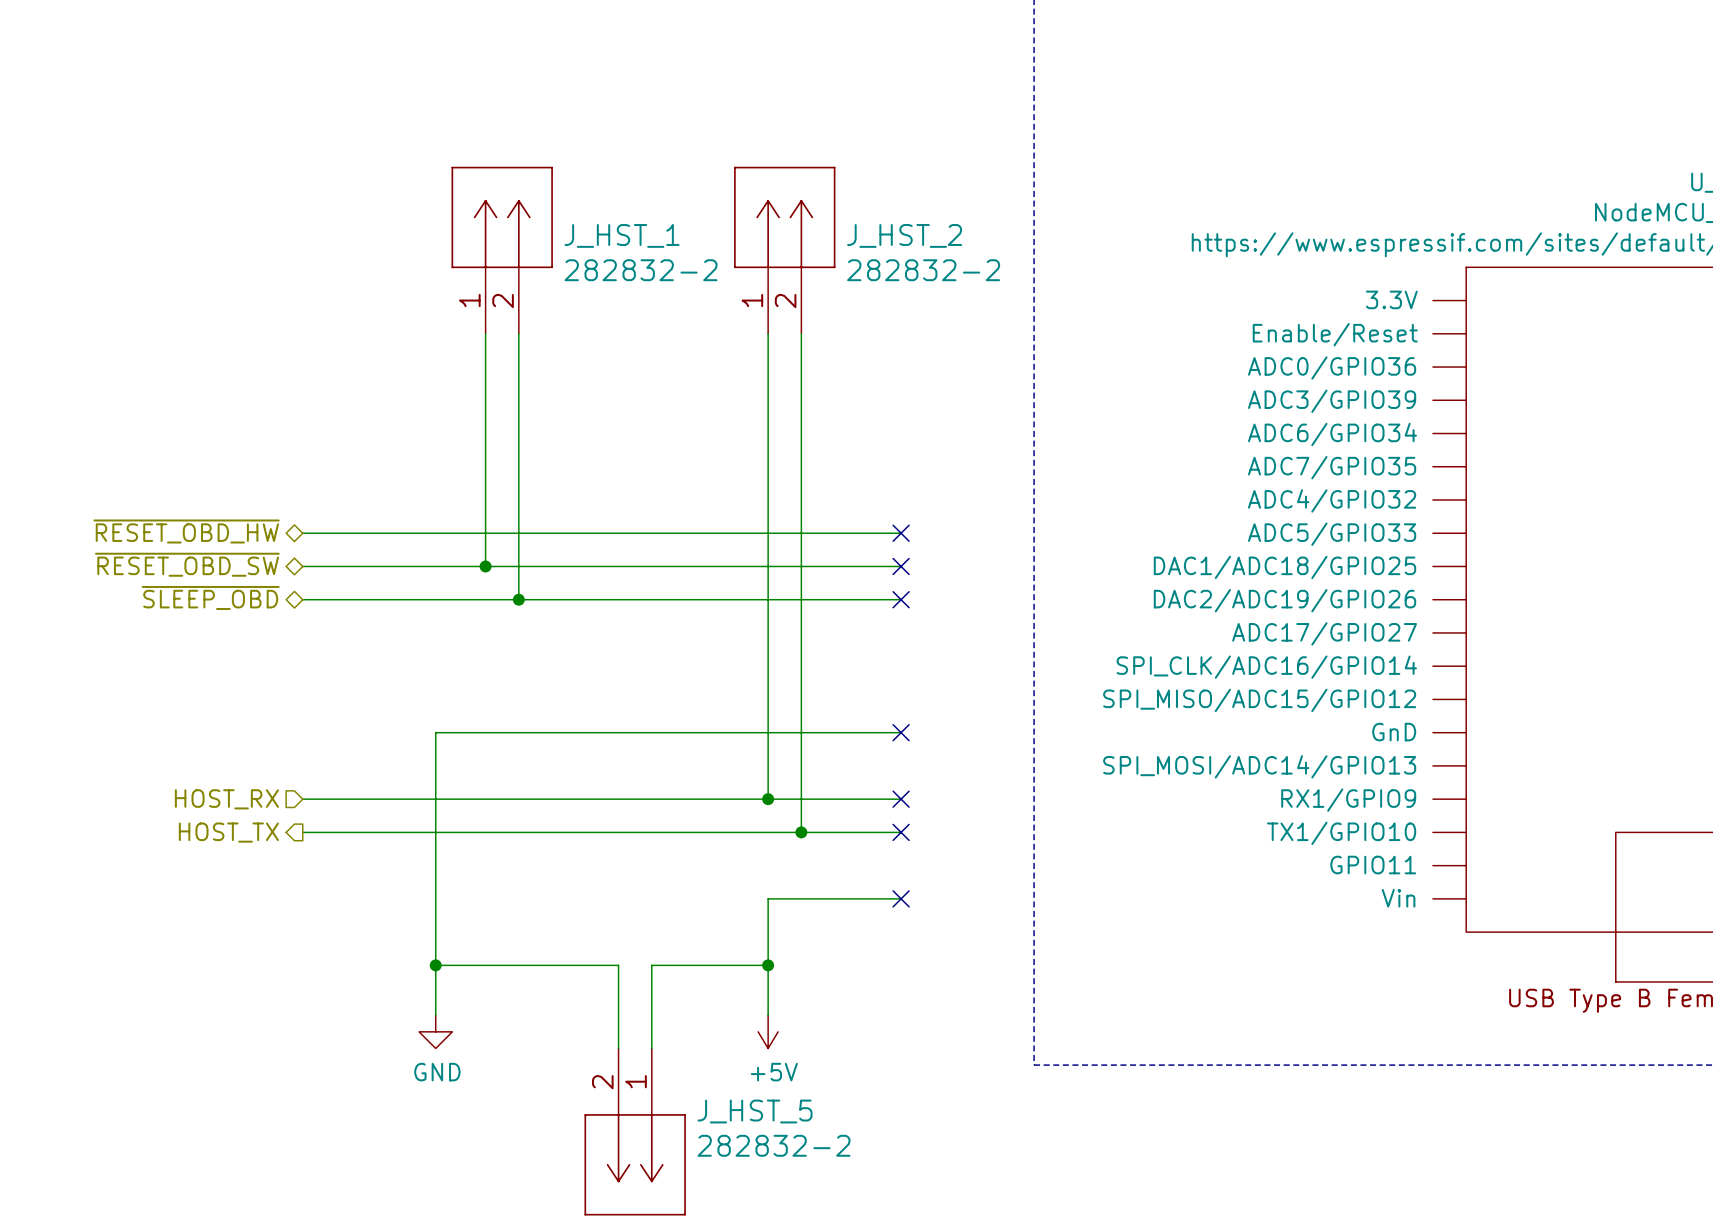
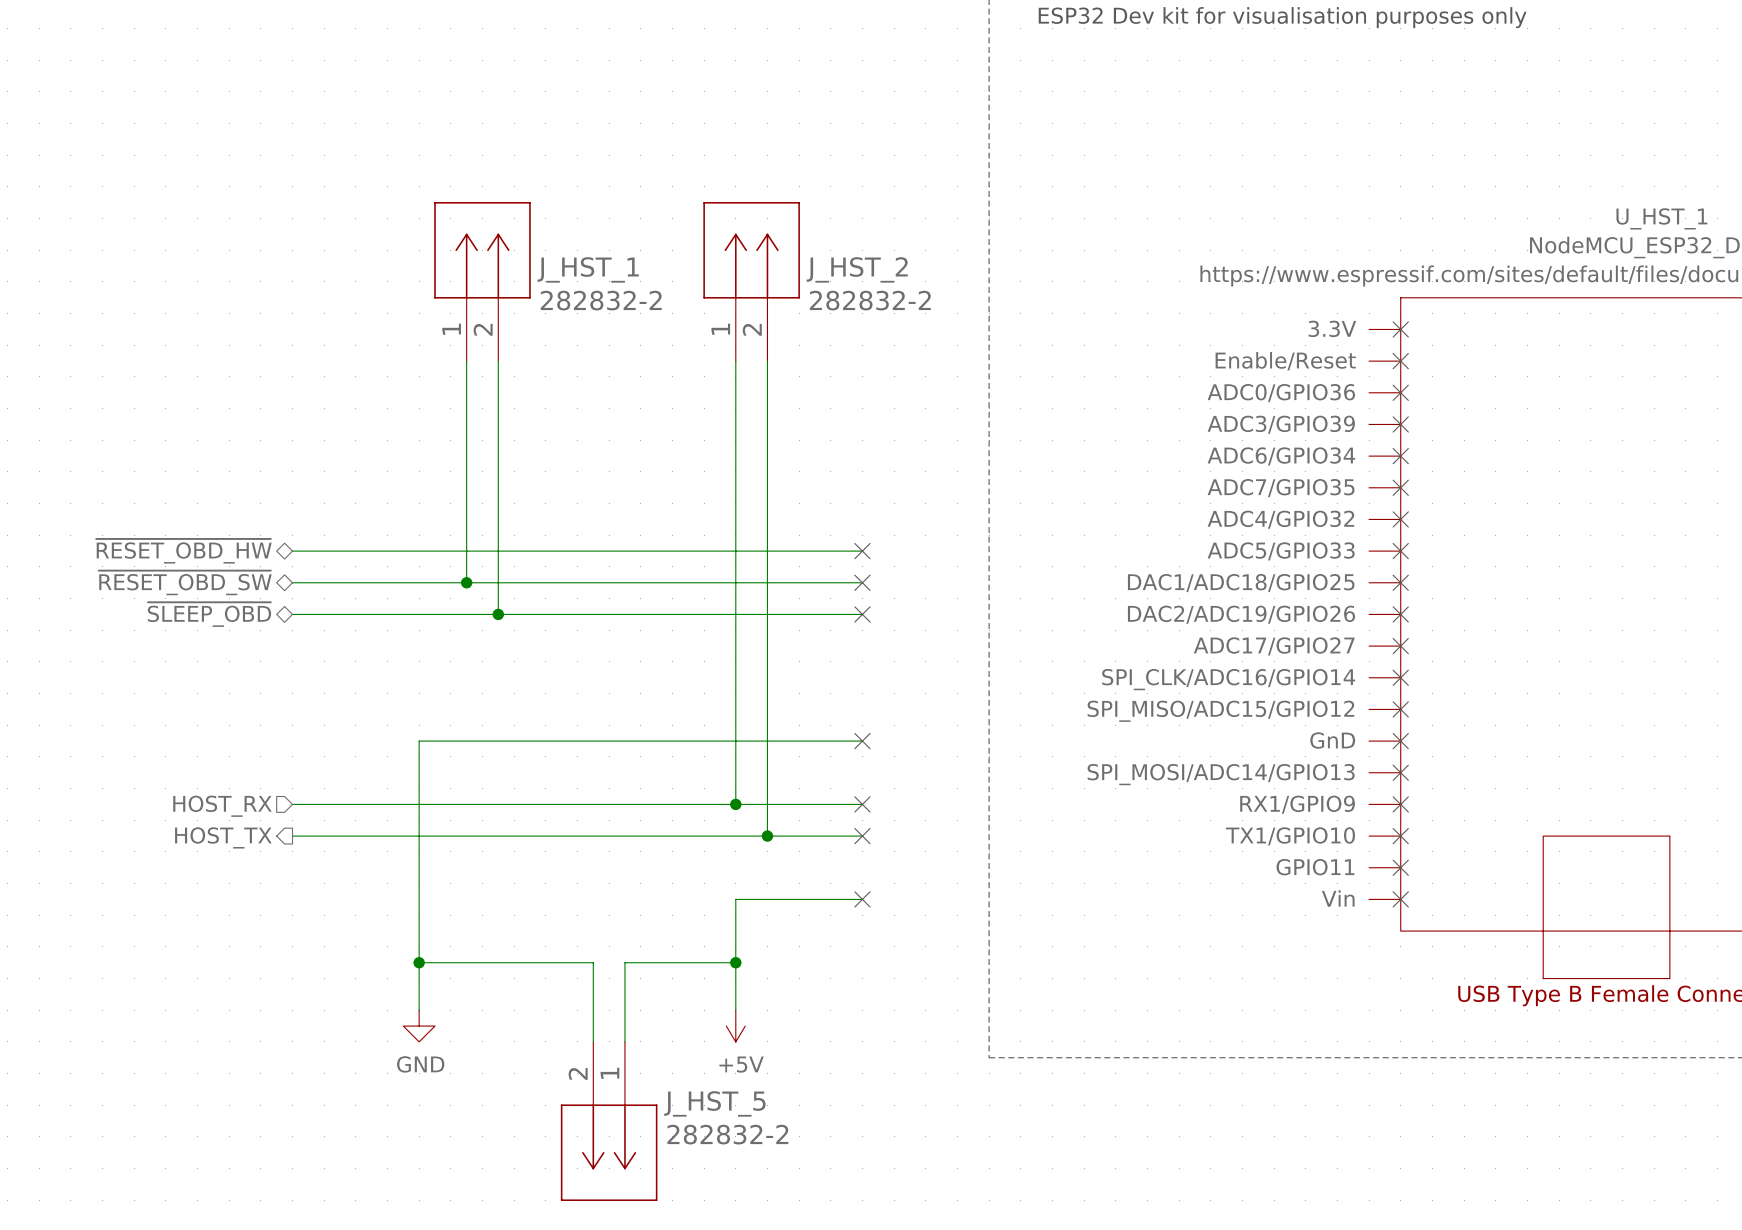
no-connect mark: none -> (1400, 329)
no-connect mark: none -> (1400, 361)
no-connect mark: none -> (1400, 392)
no-connect mark: none -> (1400, 424)
no-connect mark: none -> (1400, 456)
no-connect mark: none -> (1400, 487)
no-connect mark: none -> (1400, 519)
no-connect mark: none -> (1400, 551)
no-connect mark: none -> (1400, 582)
no-connect mark: none -> (1400, 614)
no-connect mark: none -> (1400, 646)
no-connect mark: none -> (1400, 677)
no-connect mark: none -> (1400, 709)
no-connect mark: none -> (1400, 741)
no-connect mark: none -> (1400, 772)
no-connect mark: none -> (1400, 804)
no-connect mark: none -> (1400, 836)
no-connect mark: none -> (1400, 867)
no-connect mark: none -> (1400, 899)

